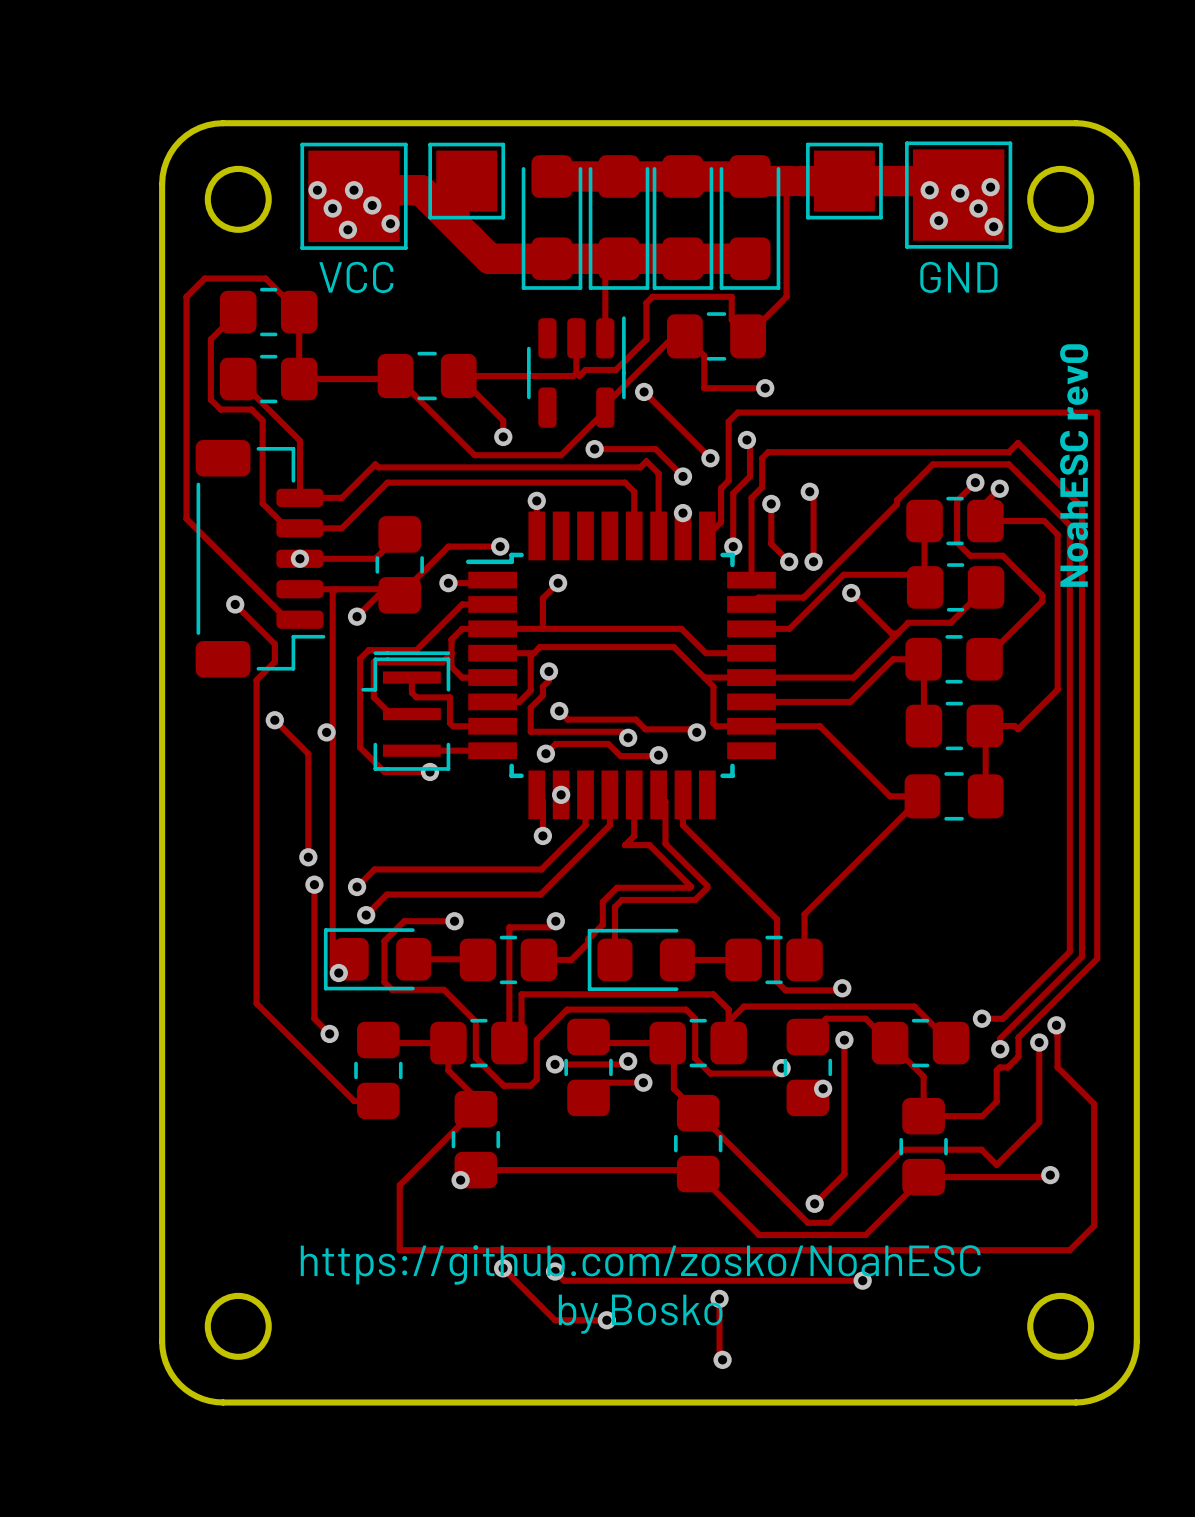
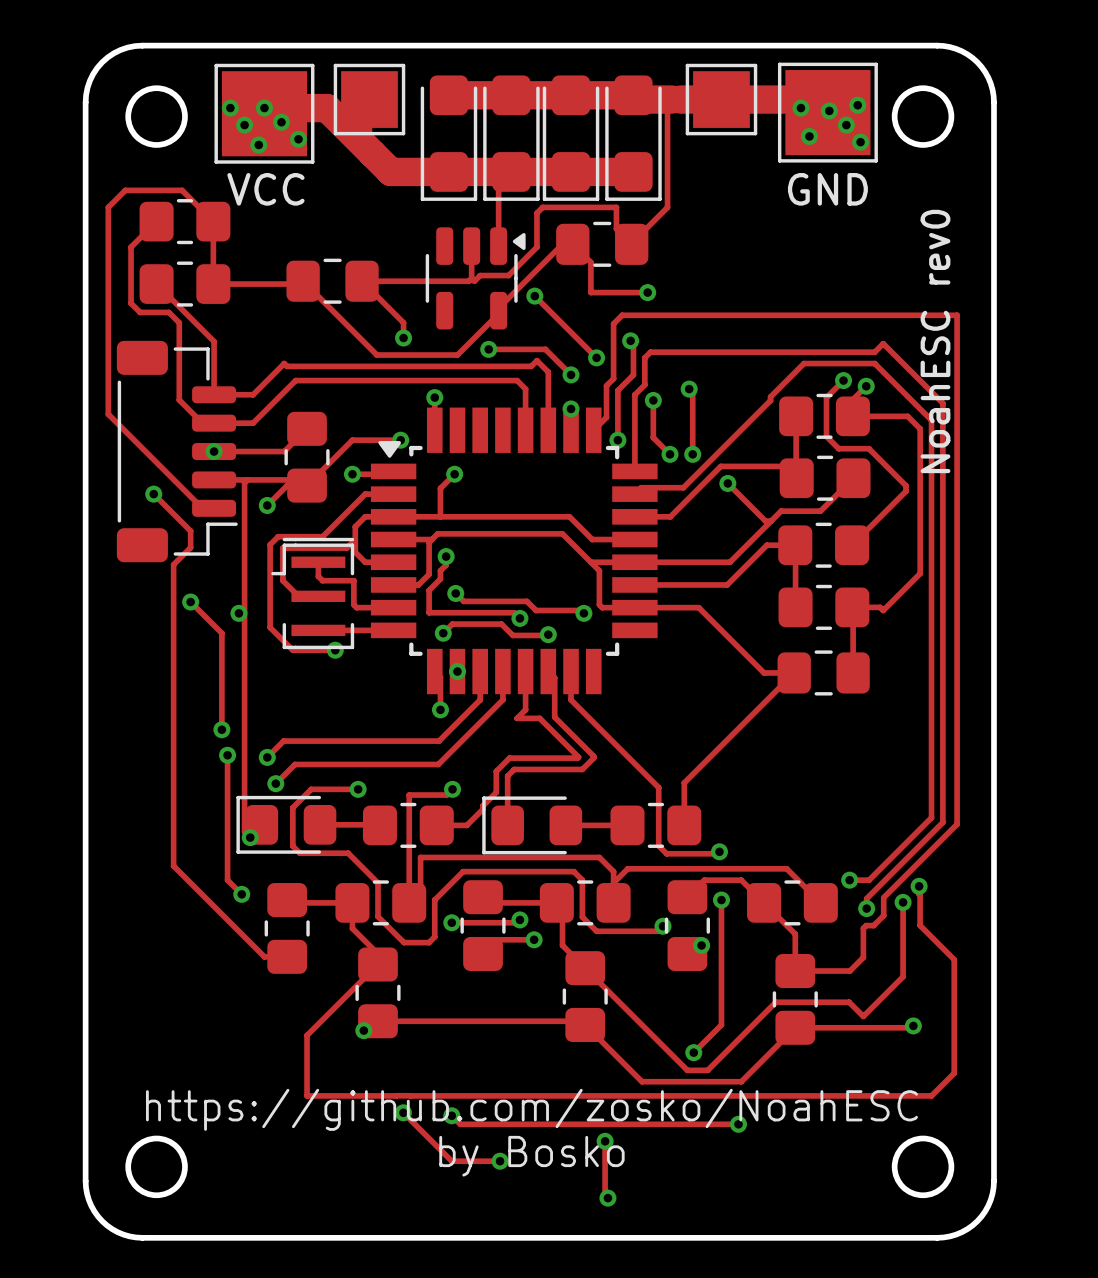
part footprint: [527, 316, 626, 428] -> [425, 227, 526, 330]
part footprint: [465, 511, 776, 820] -> [370, 407, 658, 695]

